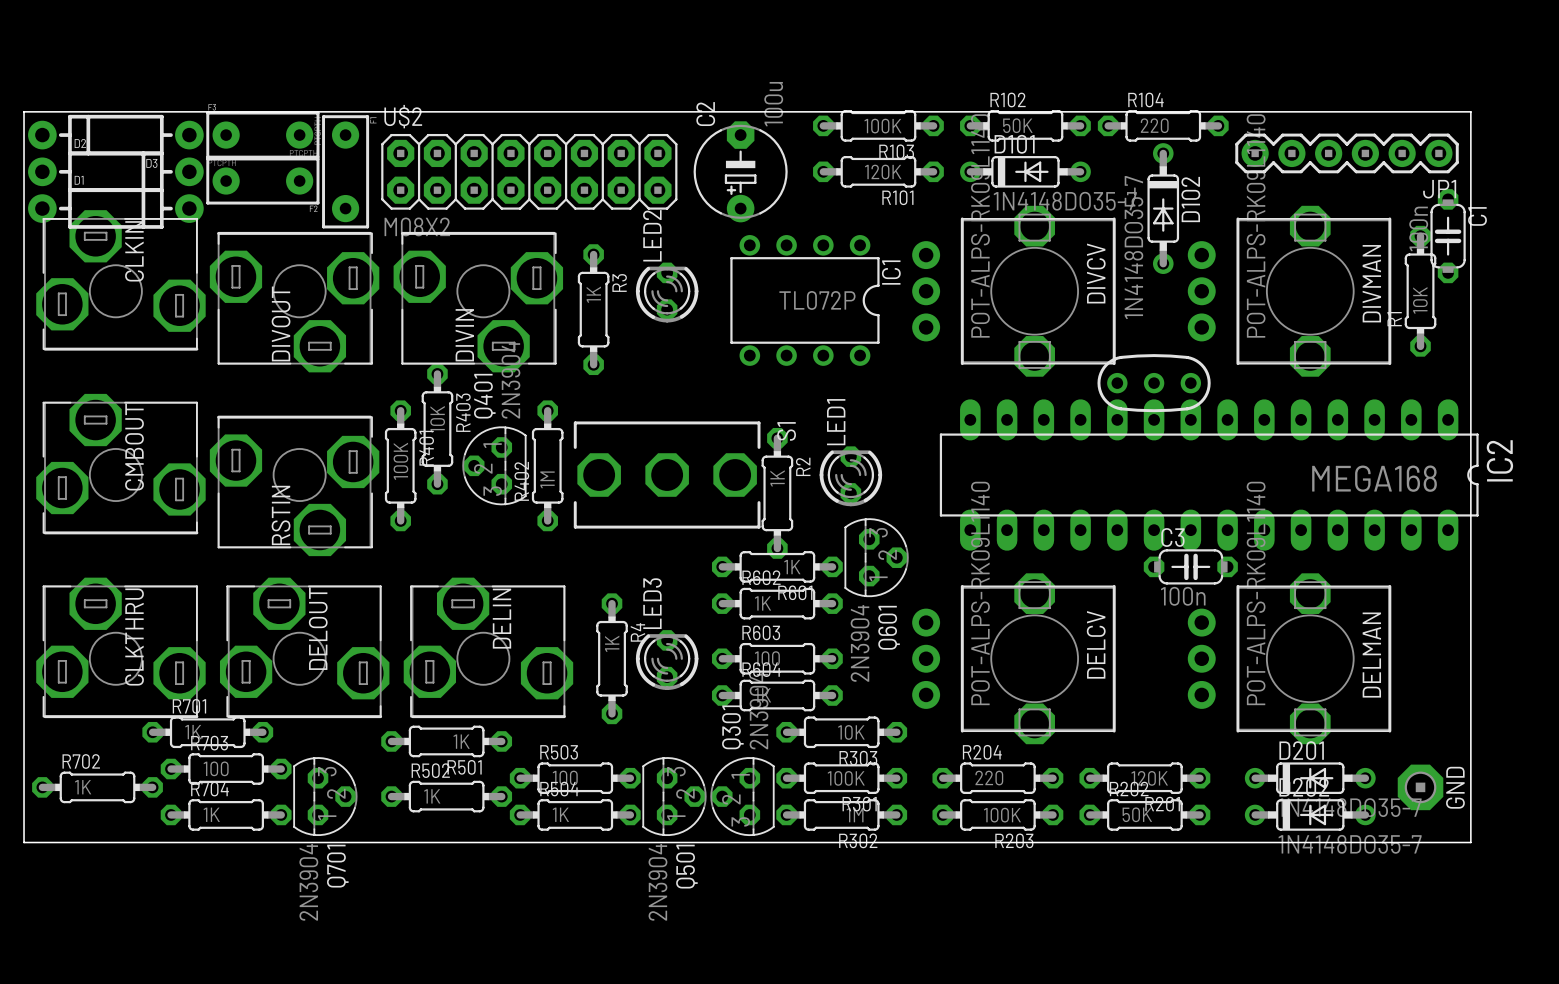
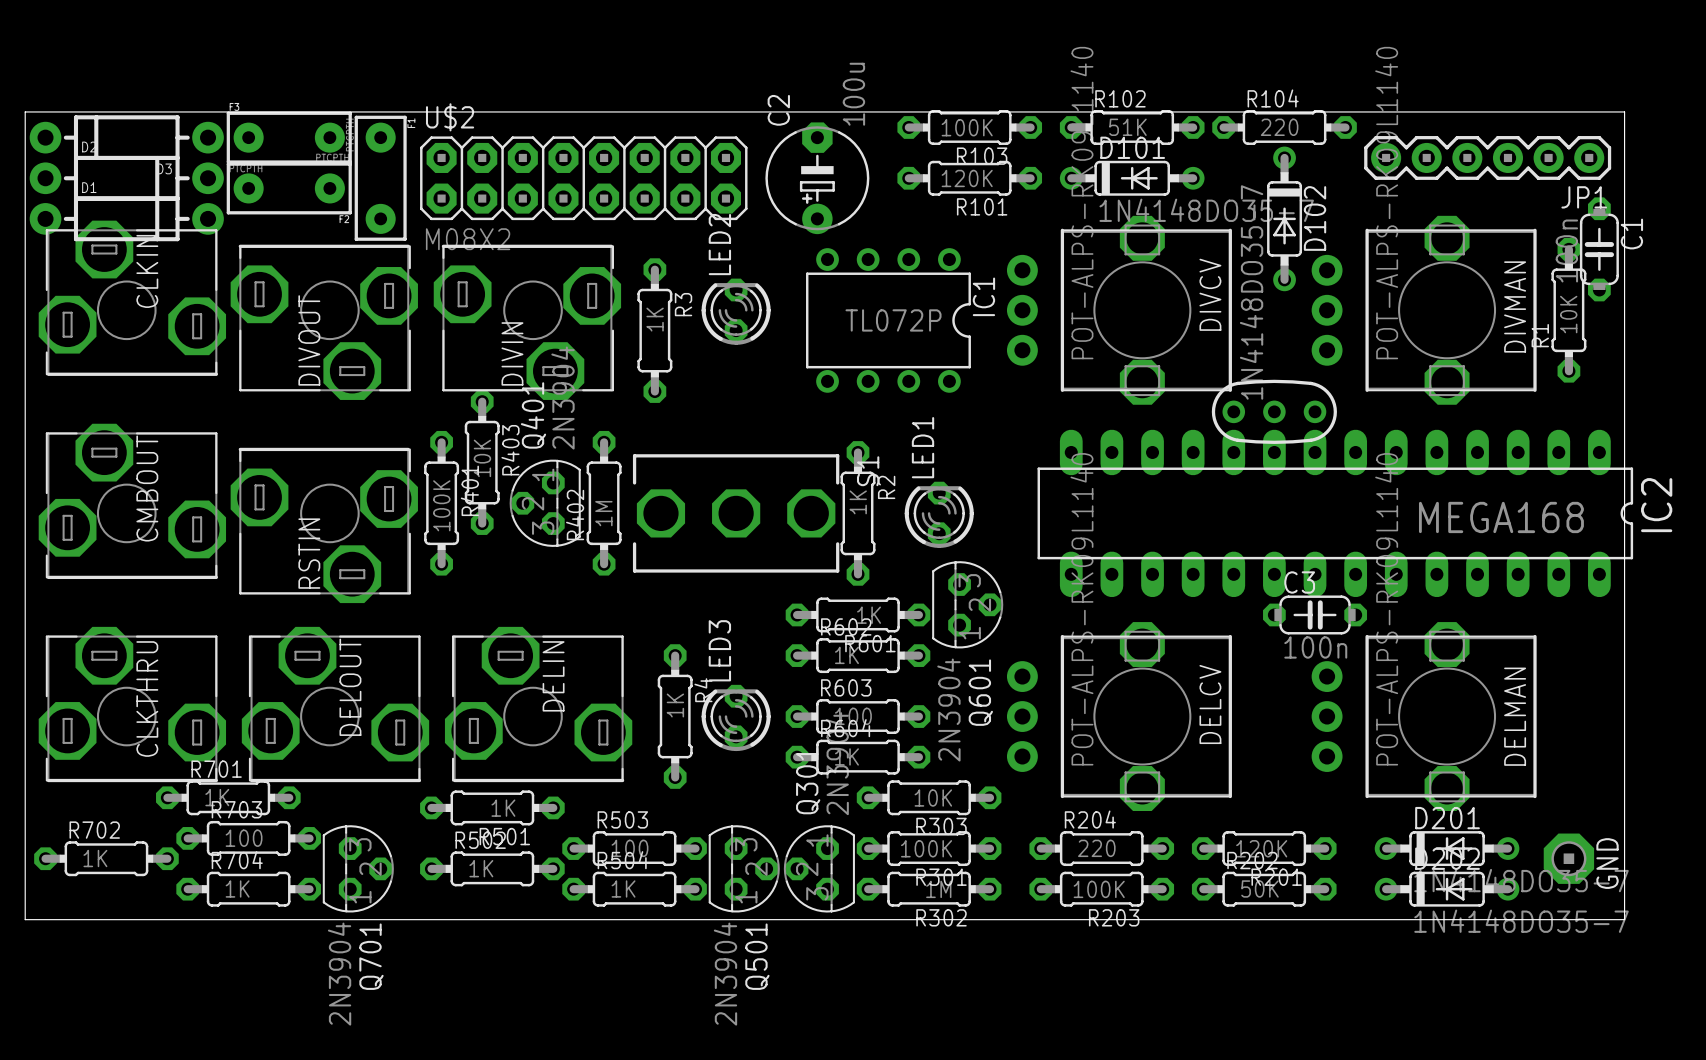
R102 value: 50K (1017, 125) -> 51K (1127, 127)
R2 position: (777, 493) -> (858, 513)

